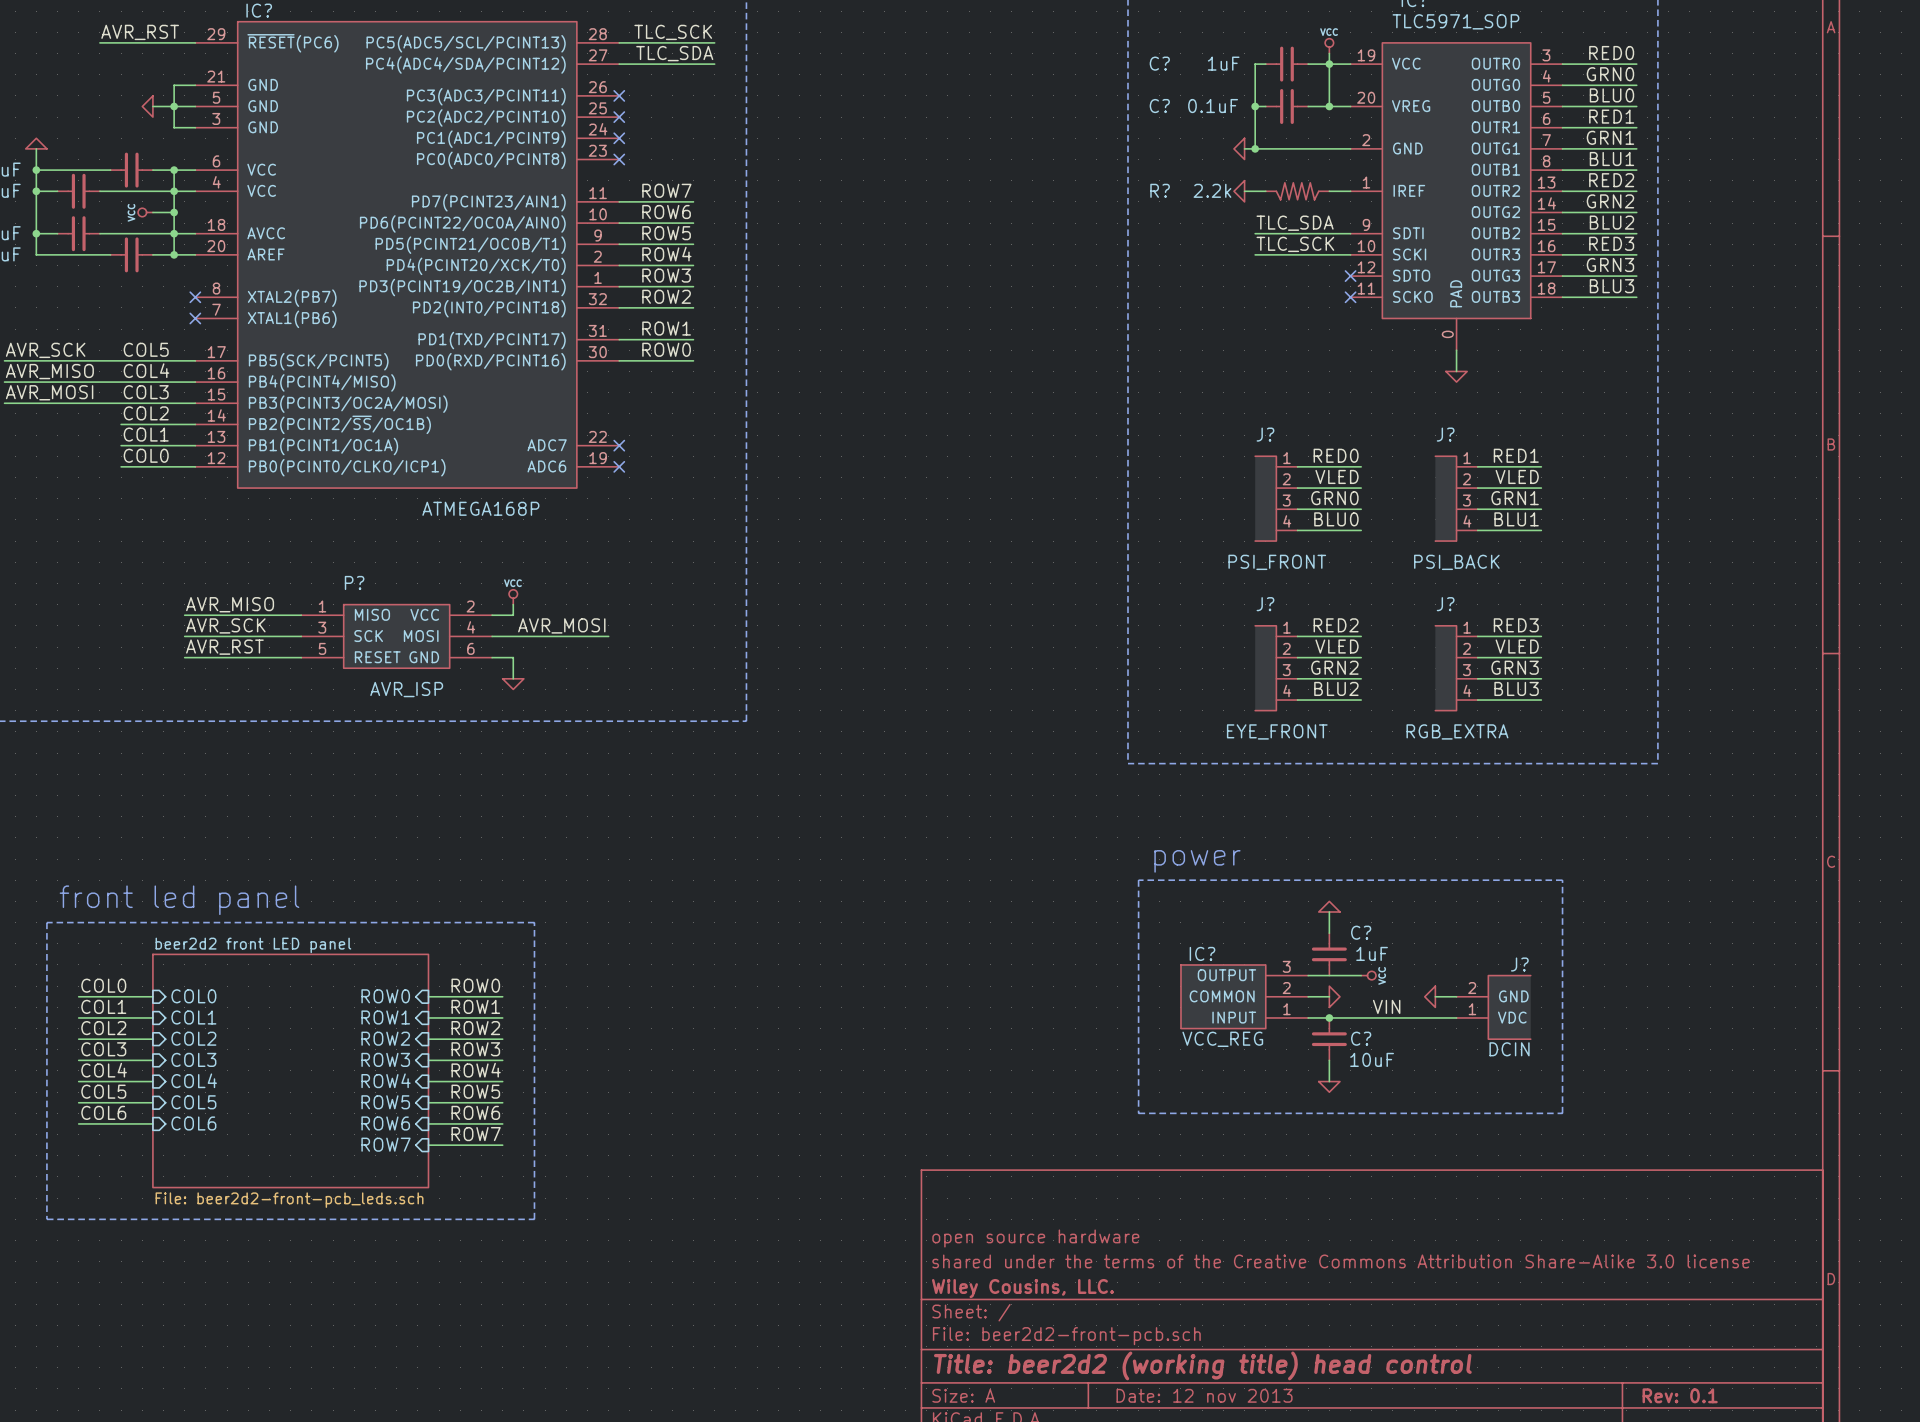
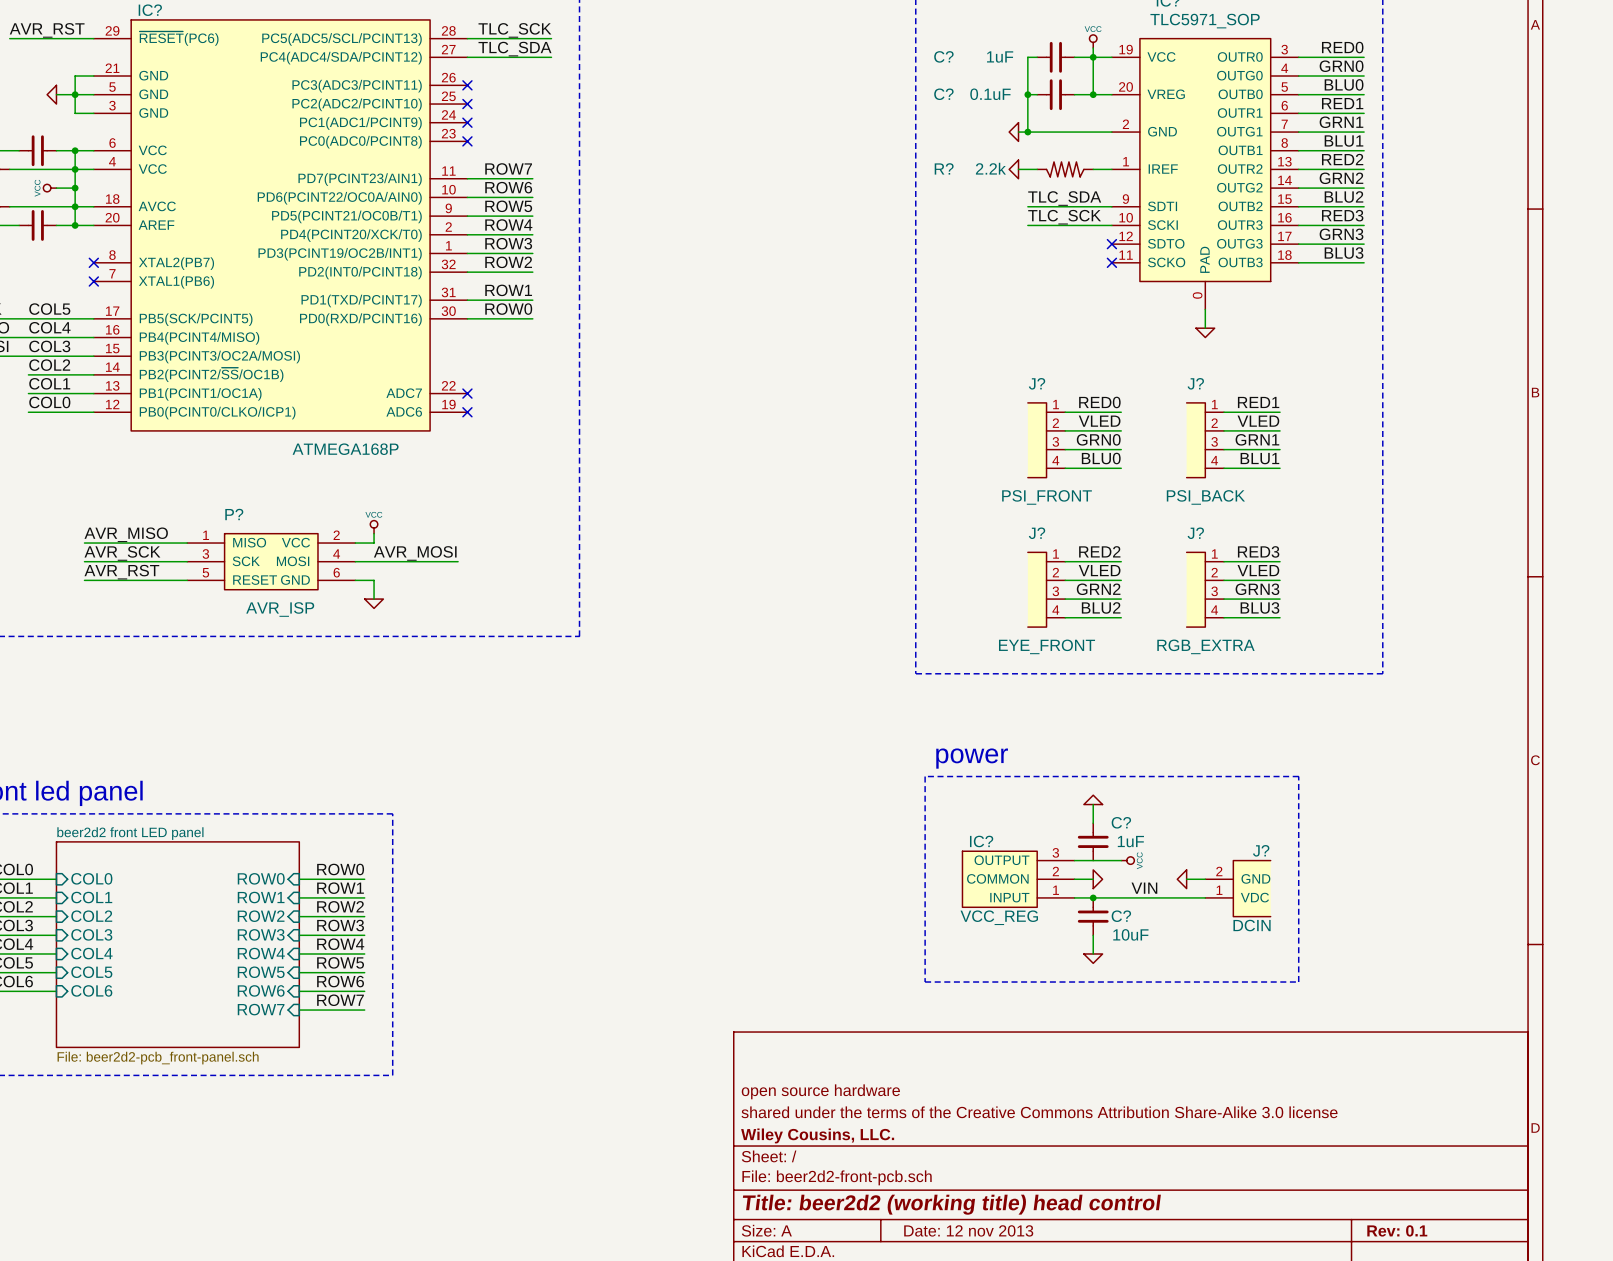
sheet beer2d2 front LED panel value: File: beer2d2-front-pcb_leds.sch (289, 1200) -> File: beer2d2-pcb_front-panel.sch (158, 1058)

